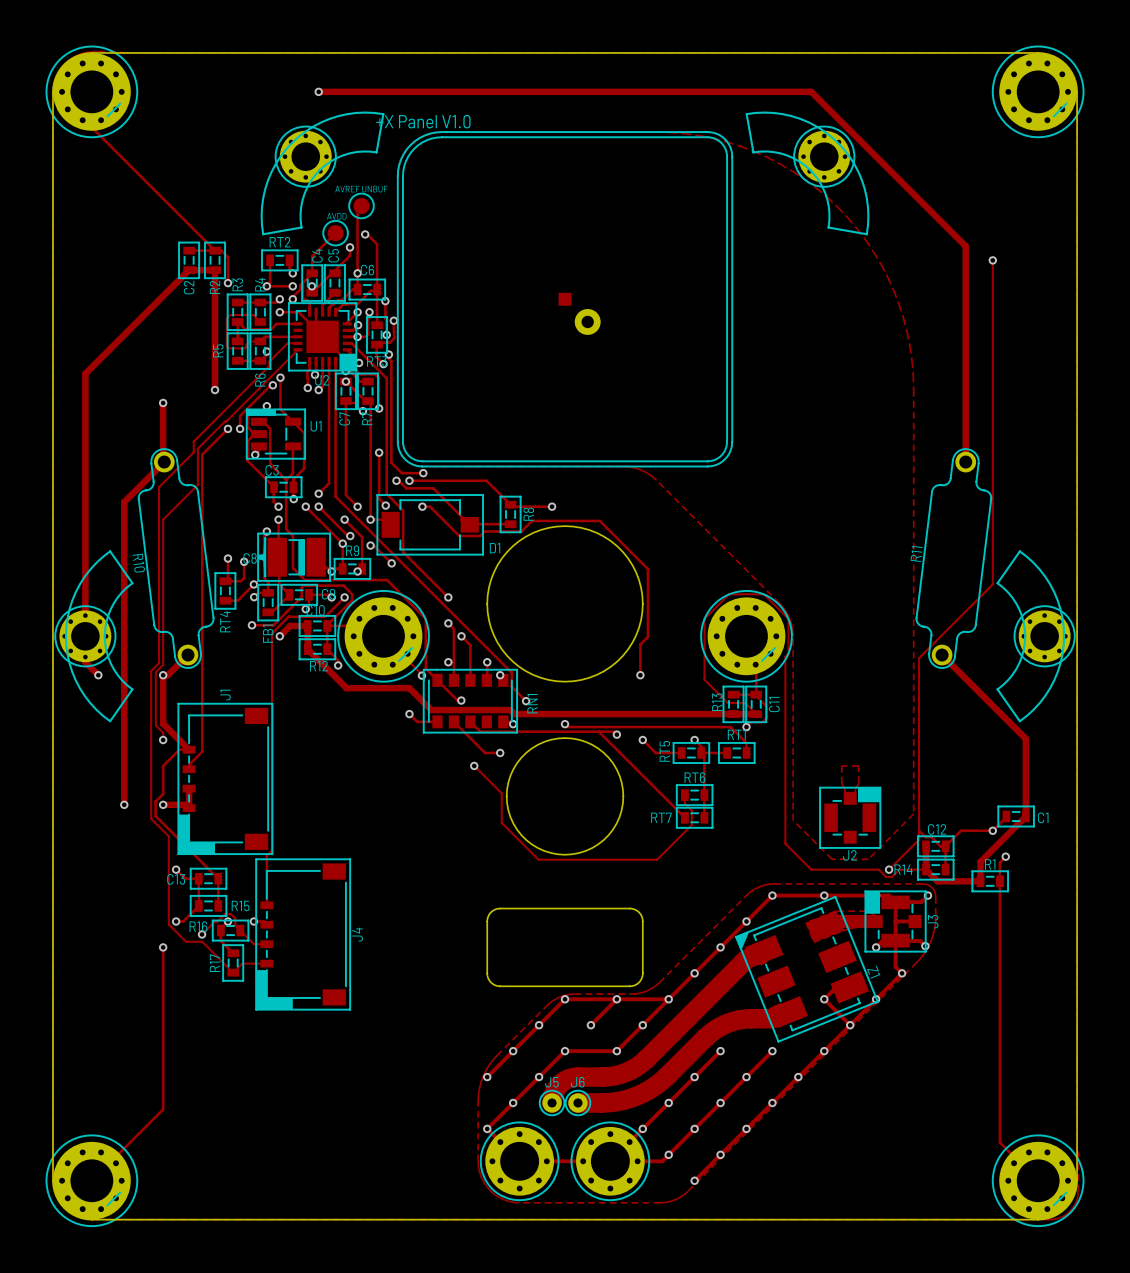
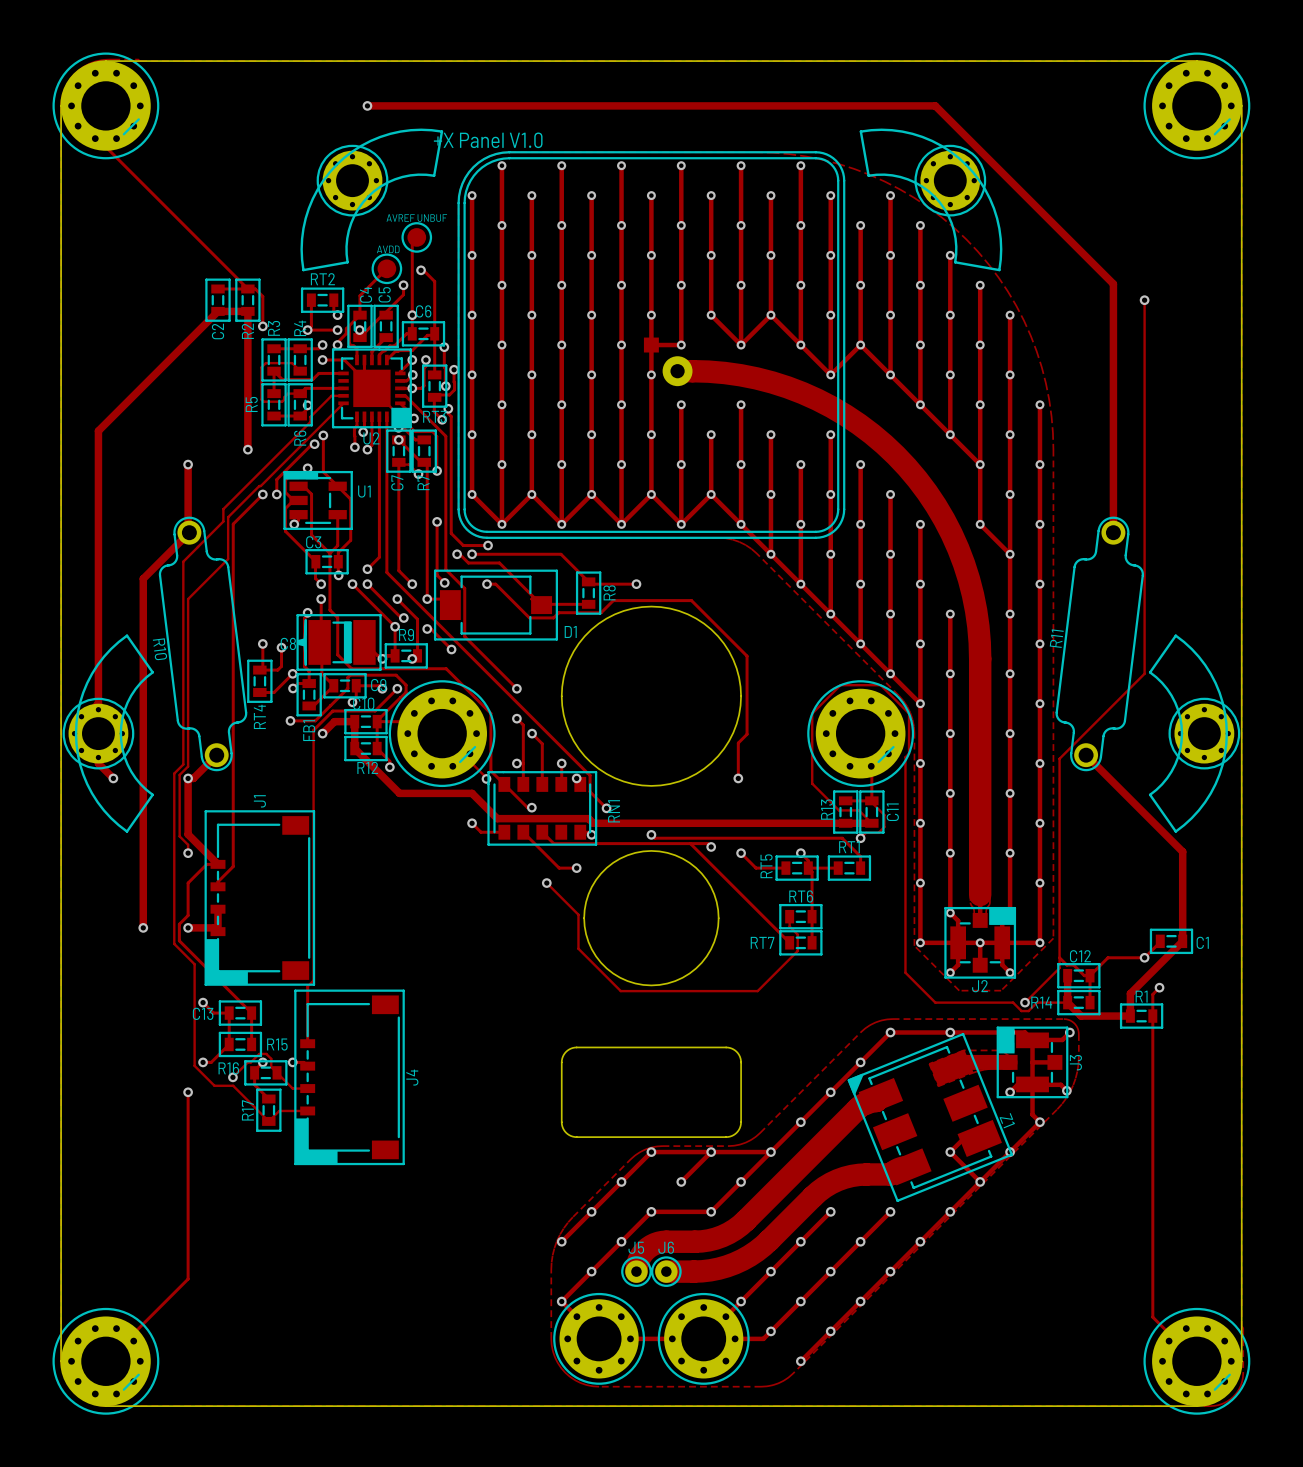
track: none -> (501, 165) (501, 524)
via: none -> (501, 165)
track: none -> (561, 165) (561, 524)
via: none -> (561, 165)
track: none -> (621, 165) (621, 524)
via: none -> (621, 165)
track: none -> (681, 165) (681, 345) (651, 345)
via: none -> (681, 165)
track: none -> (741, 165) (741, 345)
via: none -> (741, 165)
track: none -> (800, 165) (800, 345)
via: none -> (800, 165)
track: none -> (472, 195) (472, 494) (501, 524)
via: none -> (472, 195)
track: none -> (531, 195) (531, 494)
via: none -> (531, 195)
track: none -> (591, 195) (591, 494)
via: none -> (591, 195)
track: none -> (651, 195) (651, 494)
via: none -> (651, 195)
track: none -> (711, 195) (711, 315) (741, 345)
via: none -> (711, 195)
track: none -> (770, 195) (770, 315)
via: none -> (770, 195)
track: none -> (830, 195) (830, 374)
via: none -> (830, 195)
track: none -> (890, 195) (890, 374)
via: none -> (890, 195)
via: none -> (501, 225)
via: none -> (561, 225)
via: none -> (621, 225)
via: none -> (681, 225)
via: none -> (741, 225)
via: none -> (800, 225)
track: none -> (860, 225) (860, 345)
via: none -> (860, 225)
track: none -> (920, 225) (920, 404)
via: none -> (920, 225)
via: none -> (472, 255)
via: none -> (531, 255)
via: none -> (591, 255)
via: none -> (651, 255)
via: none -> (711, 255)
via: none -> (770, 255)
via: none -> (830, 255)
via: none -> (890, 255)
track: none -> (950, 255) (950, 434)
via: none -> (950, 255)
via: none -> (501, 285)
via: none -> (561, 285)
via: none -> (621, 285)
via: none -> (681, 285)
via: none -> (741, 285)
via: none -> (800, 285)
via: none -> (860, 285)
via: none -> (920, 285)
track: none -> (980, 285) (980, 524) (1010, 554)
via: none -> (980, 285)
via: none -> (472, 315)
via: none -> (531, 315)
via: none -> (591, 315)
via: none -> (651, 315)
via: none -> (711, 315)
track: none -> (770, 315) (741, 345)
track: none -> (770, 315) (830, 374)
via: none -> (770, 315)
via: none -> (830, 315)
via: none -> (890, 315)
via: none -> (950, 315)
track: none -> (1010, 315) (1010, 912) (1002, 920) (1002, 964) (1010, 972)
via: none -> (1010, 315)
via: none -> (501, 345)
via: none -> (561, 345)
via: none -> (621, 345)
via: none -> (681, 345)
via: none -> (741, 345)
via: none -> (800, 345)
track: none -> (860, 345) (830, 374)
track: none -> (860, 345) (980, 464)
via: none -> (860, 345)
via: none -> (920, 345)
via: none -> (980, 345)
track: none -> (677, 371) (724, 372) (756, 378) (787, 387) (831, 407) (871, 433) (895, 455) (917, 479) (944, 519) (958, 548) (968, 579) (978, 626) (980, 658) (980, 920)
via: none -> (472, 374)
via: none -> (531, 374)
via: none -> (591, 374)
via: none -> (651, 374)
via: none -> (830, 374)
via: none -> (890, 374)
via: none -> (950, 374)
via: none -> (1010, 374)
via: none -> (501, 404)
via: none -> (561, 404)
via: none -> (621, 404)
track: none -> (681, 404) (681, 524)
via: none -> (681, 404)
track: none -> (741, 404) (741, 524)
via: none -> (741, 404)
via: none -> (920, 404)
via: none -> (980, 404)
track: none -> (1039, 404) (1039, 942) (920, 942) (920, 524)
via: none -> (1039, 404)
via: none -> (472, 434)
via: none -> (531, 434)
via: none -> (591, 434)
via: none -> (651, 434)
track: none -> (711, 434) (711, 494)
via: none -> (711, 434)
track: none -> (770, 434) (770, 554)
via: none -> (770, 434)
track: none -> (830, 434) (830, 614)
via: none -> (830, 434)
via: none -> (950, 434)
via: none -> (1010, 434)
via: none -> (501, 464)
via: none -> (561, 464)
via: none -> (621, 464)
via: none -> (681, 464)
via: none -> (741, 464)
track: none -> (800, 464) (800, 584)
via: none -> (800, 464)
track: none -> (860, 464) (860, 643)
via: none -> (860, 464)
via: none -> (980, 464)
via: none -> (1039, 464)
via: none -> (472, 494)
track: none -> (531, 494) (561, 524)
track: none -> (531, 494) (501, 524)
via: none -> (531, 494)
track: none -> (591, 494) (621, 524)
track: none -> (591, 494) (561, 524)
via: none -> (591, 494)
track: none -> (651, 494) (681, 524)
track: none -> (651, 494) (621, 524)
via: none -> (651, 494)
track: none -> (711, 494) (920, 703)
track: none -> (711, 494) (681, 524)
via: none -> (711, 494)
via: none -> (770, 494)
via: none -> (830, 494)
track: none -> (890, 494) (890, 673)
via: none -> (890, 494)
via: none -> (1010, 494)
via: none -> (501, 524)
via: none -> (561, 524)
via: none -> (621, 524)
via: none -> (681, 524)
via: none -> (741, 524)
via: none -> (800, 524)
via: none -> (860, 524)
via: none -> (920, 524)
via: none -> (980, 524)
via: none -> (1039, 524)
via: none -> (770, 554)
via: none -> (830, 554)
via: none -> (890, 554)
via: none -> (1010, 554)
via: none -> (800, 584)
via: none -> (860, 584)
via: none -> (920, 584)
via: none -> (1039, 584)
via: none -> (830, 614)
via: none -> (890, 614)
track: none -> (950, 614) (950, 912) (958, 920) (958, 964) (950, 972)
via: none -> (950, 614)
via: none -> (1010, 614)
via: none -> (860, 643)
via: none -> (920, 643)
via: none -> (1039, 643)
via: none -> (890, 673)
via: none -> (950, 673)
via: none -> (1010, 673)
via: none -> (920, 703)
via: none -> (1039, 703)
via: none -> (950, 733)
via: none -> (1010, 733)
via: none -> (920, 763)
via: none -> (1039, 763)
via: none -> (950, 793)
via: none -> (1010, 793)
via: none -> (920, 823)
via: none -> (1039, 823)
via: none -> (950, 853)
via: none -> (1010, 853)
via: none -> (920, 883)
via: none -> (1039, 883)
via: none -> (950, 912)
via: none -> (920, 942)
track: none -> (980, 942) (980, 965)
via: none -> (980, 942)
via: none -> (1039, 942)
via: none -> (950, 972)
via: none -> (1010, 972)

